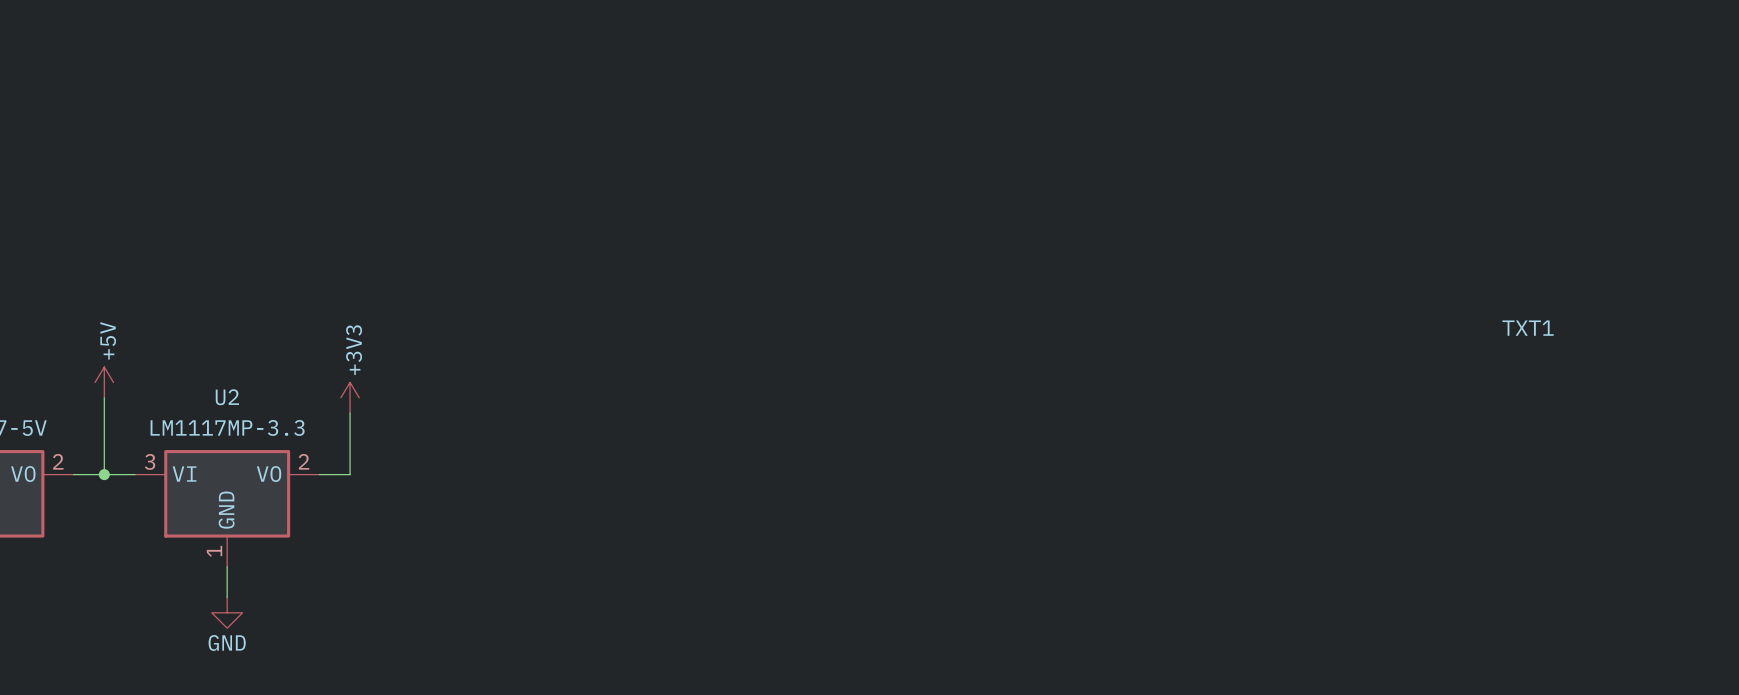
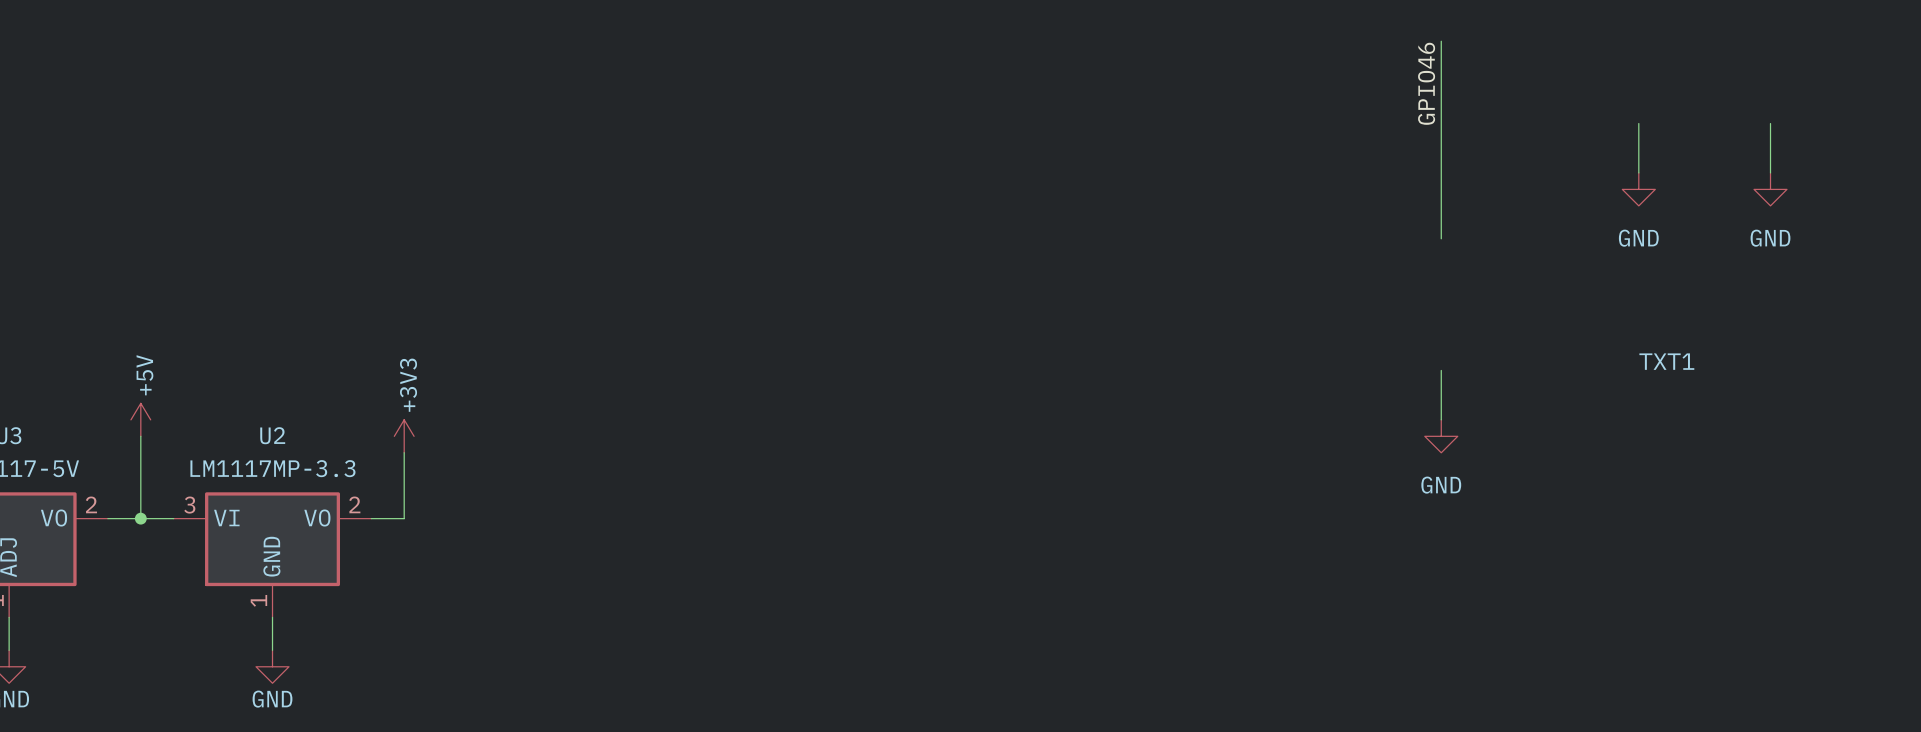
wire: none -> (1441, 41) (1441, 238)
label: none -> GPIO46 (1426, 83)
wire: none -> (1638, 123) (1638, 172)
wire: none -> (1770, 123) (1770, 172)
power symbol: none -> GND (1638, 189)
power symbol: none -> GND (1770, 189)
wire: none -> (1441, 370) (1441, 419)
power symbol: none -> GND (1441, 436)

